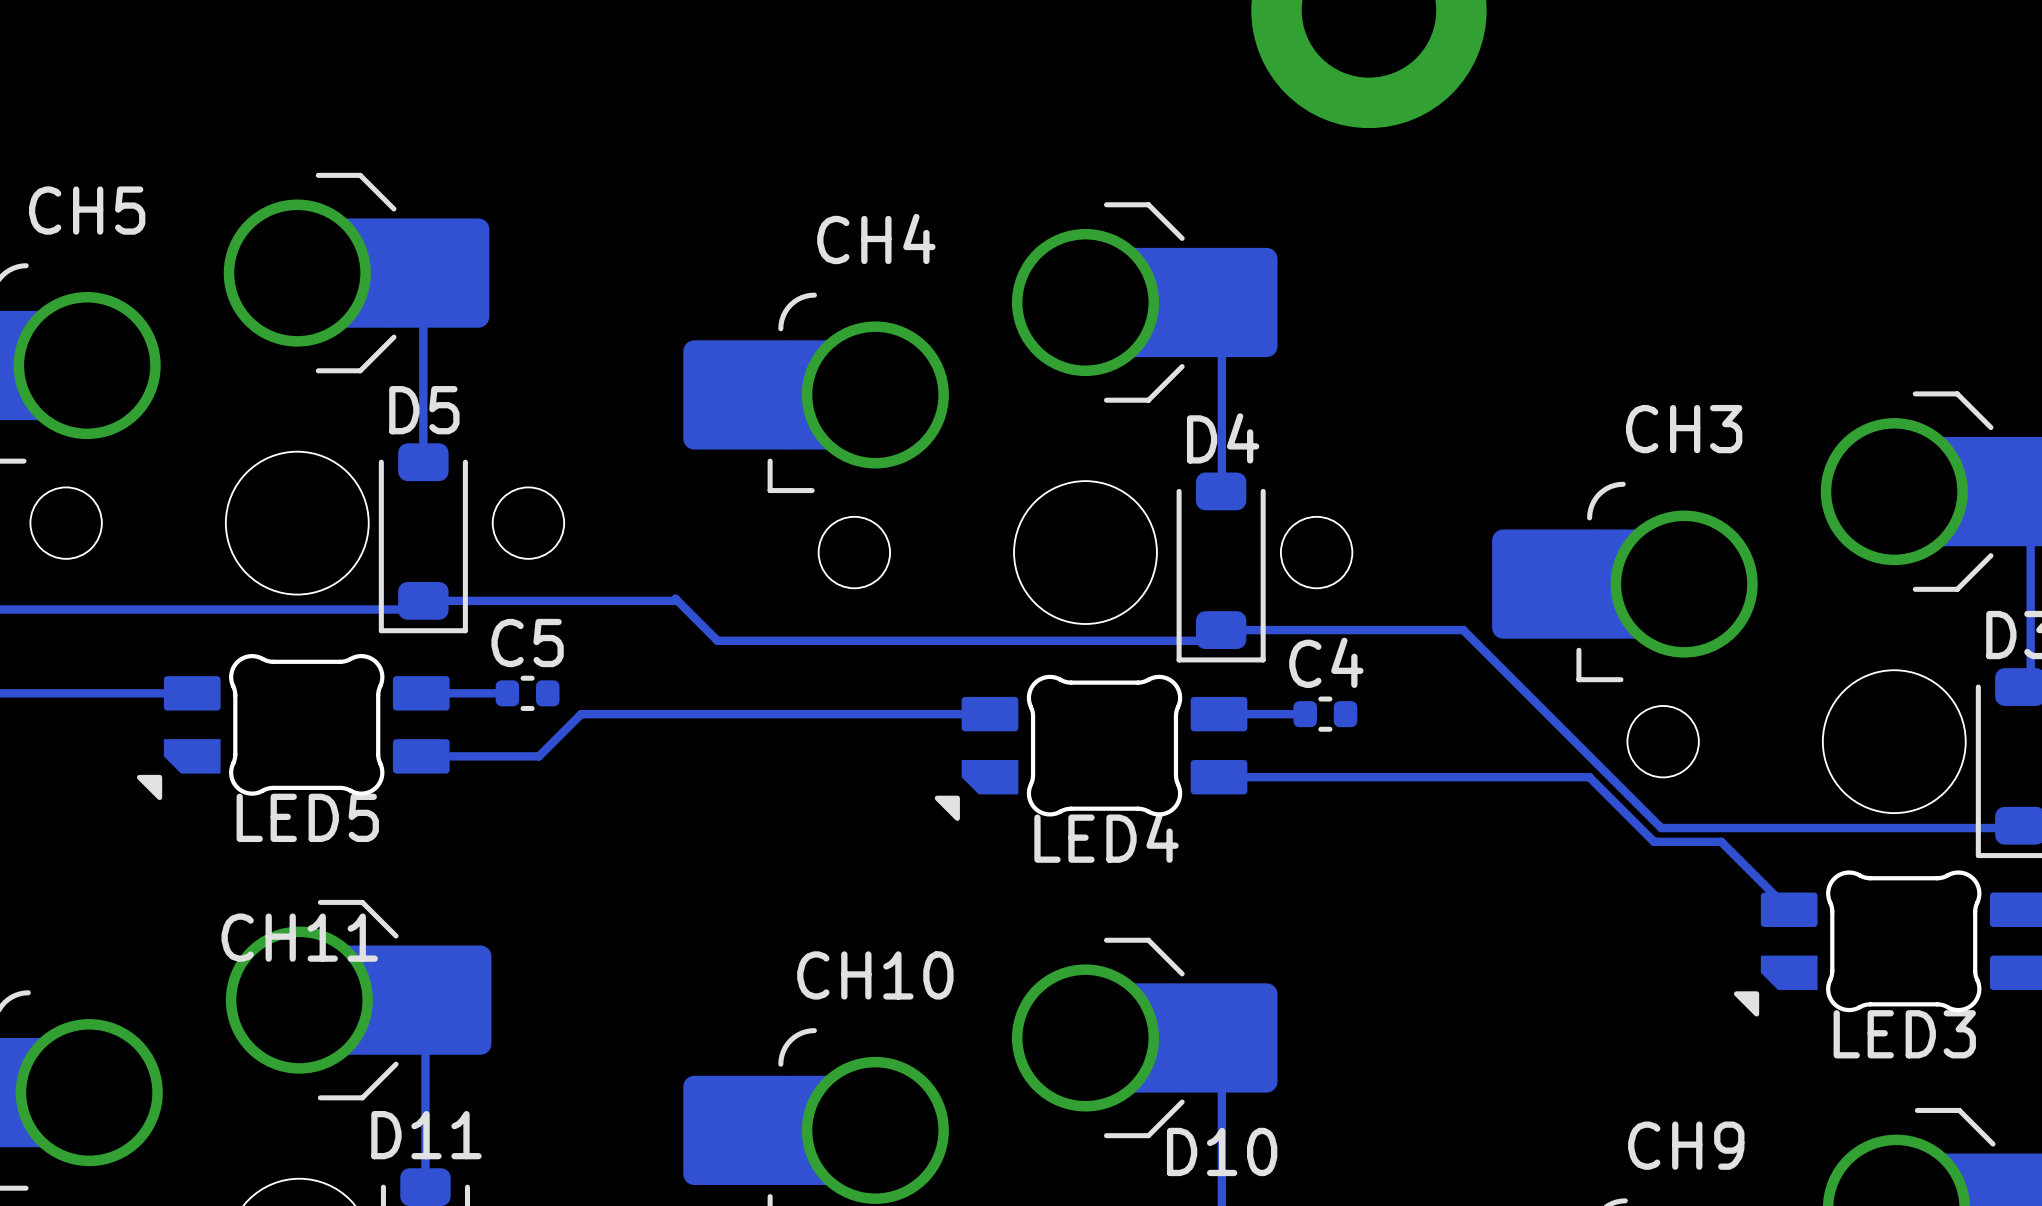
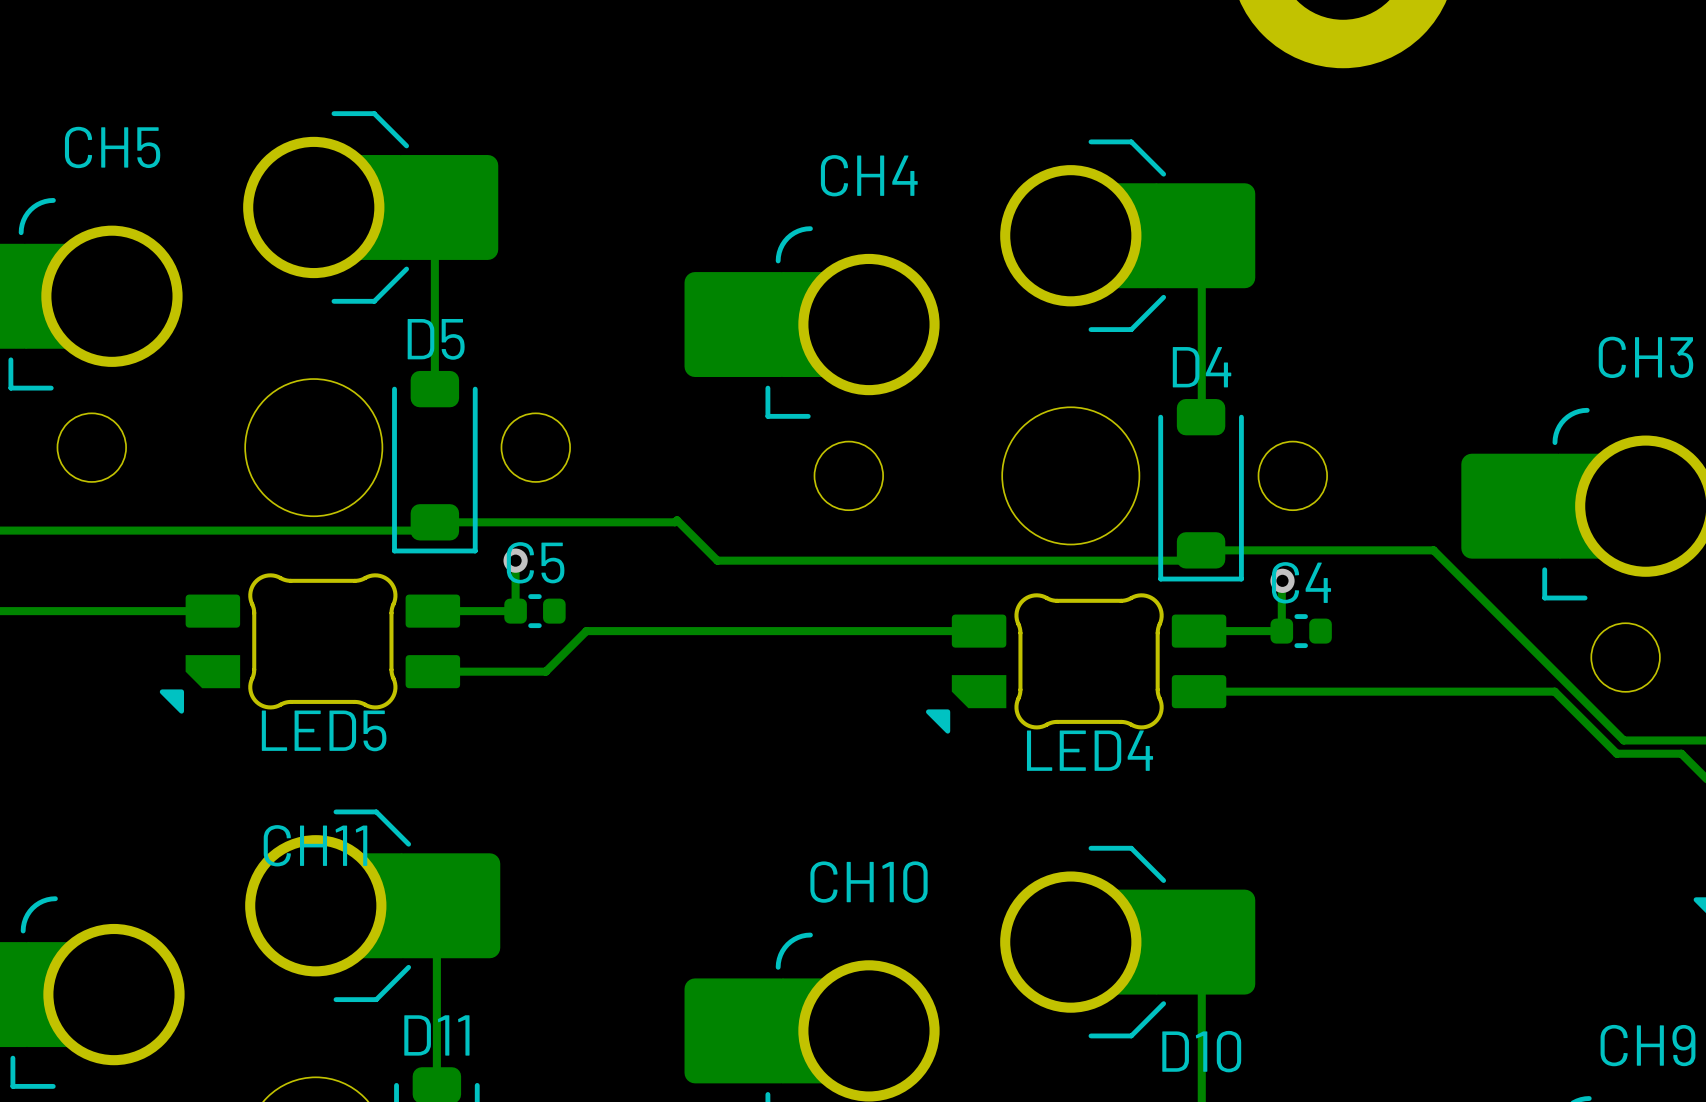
track: none -> (515, 560) (515, 611)
via: none -> (515, 560)
track: none -> (1282, 580) (1281, 631)
via: none -> (1282, 580)

